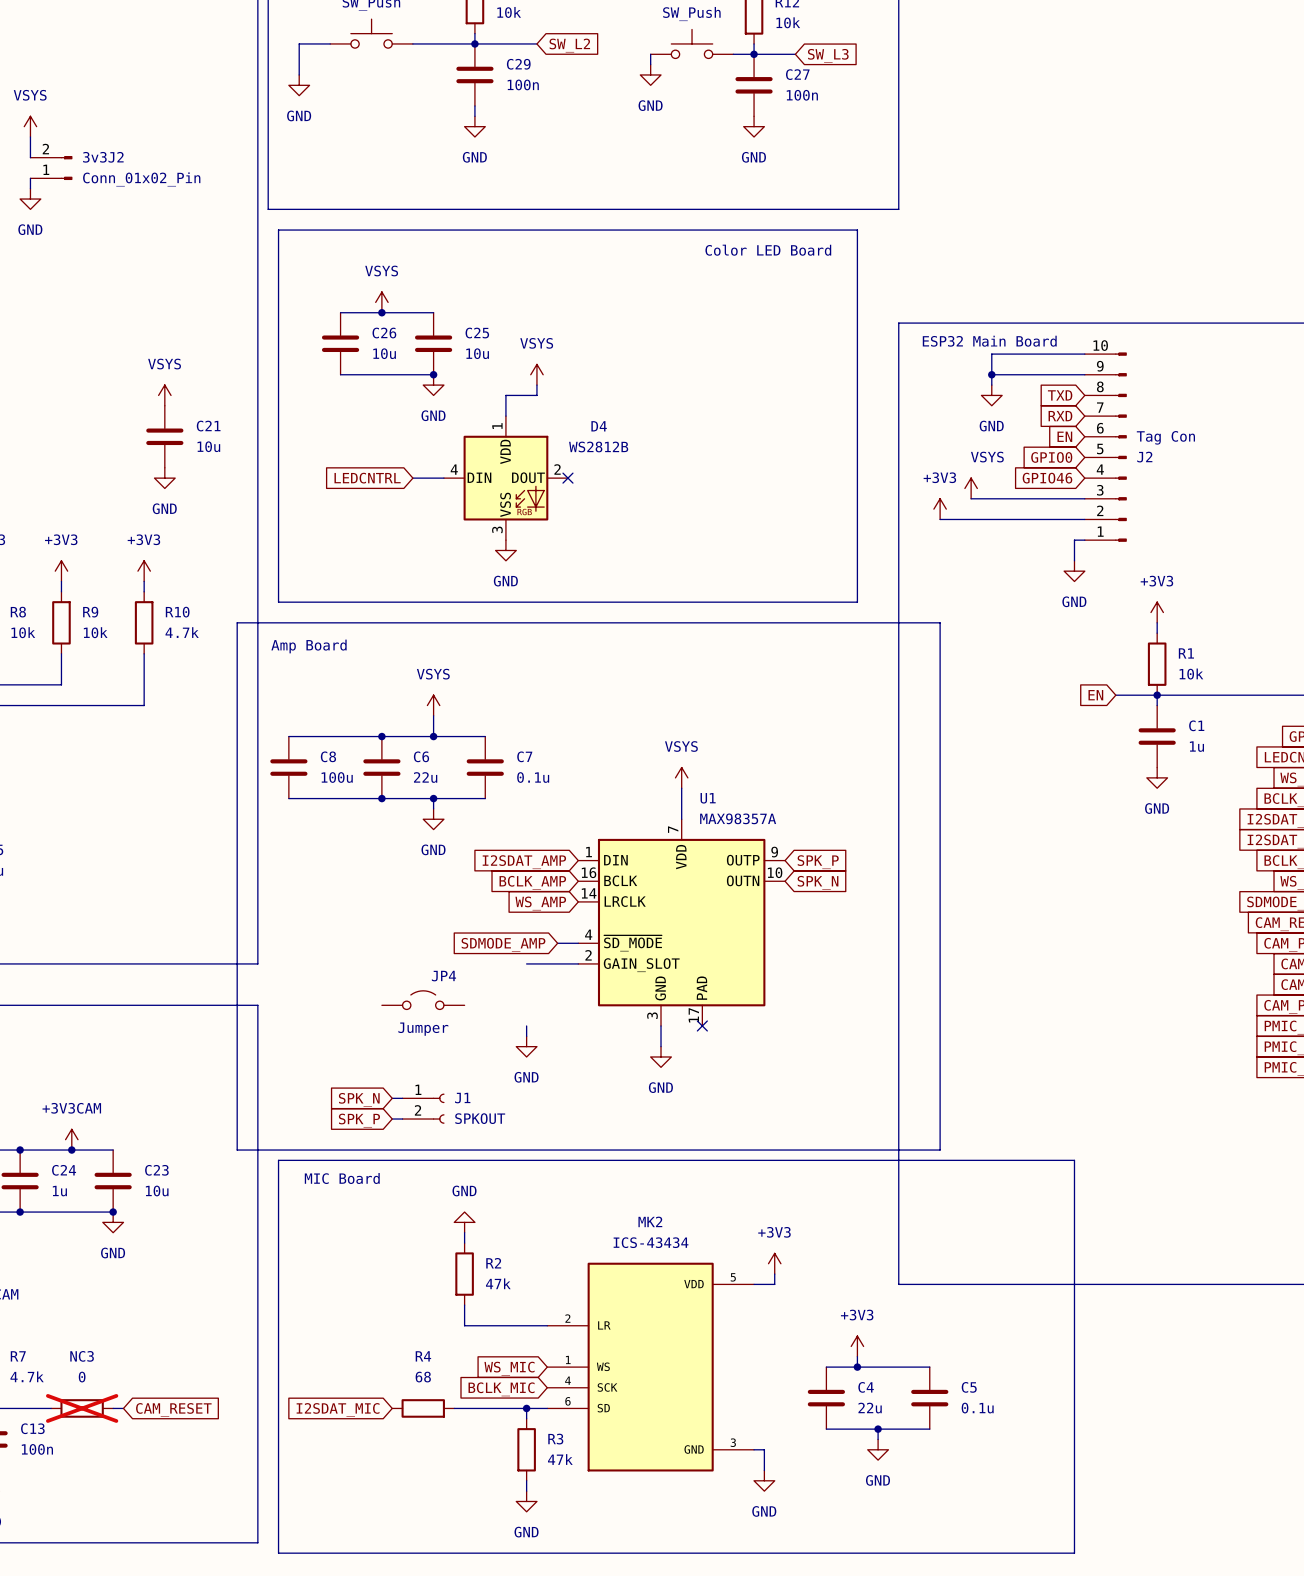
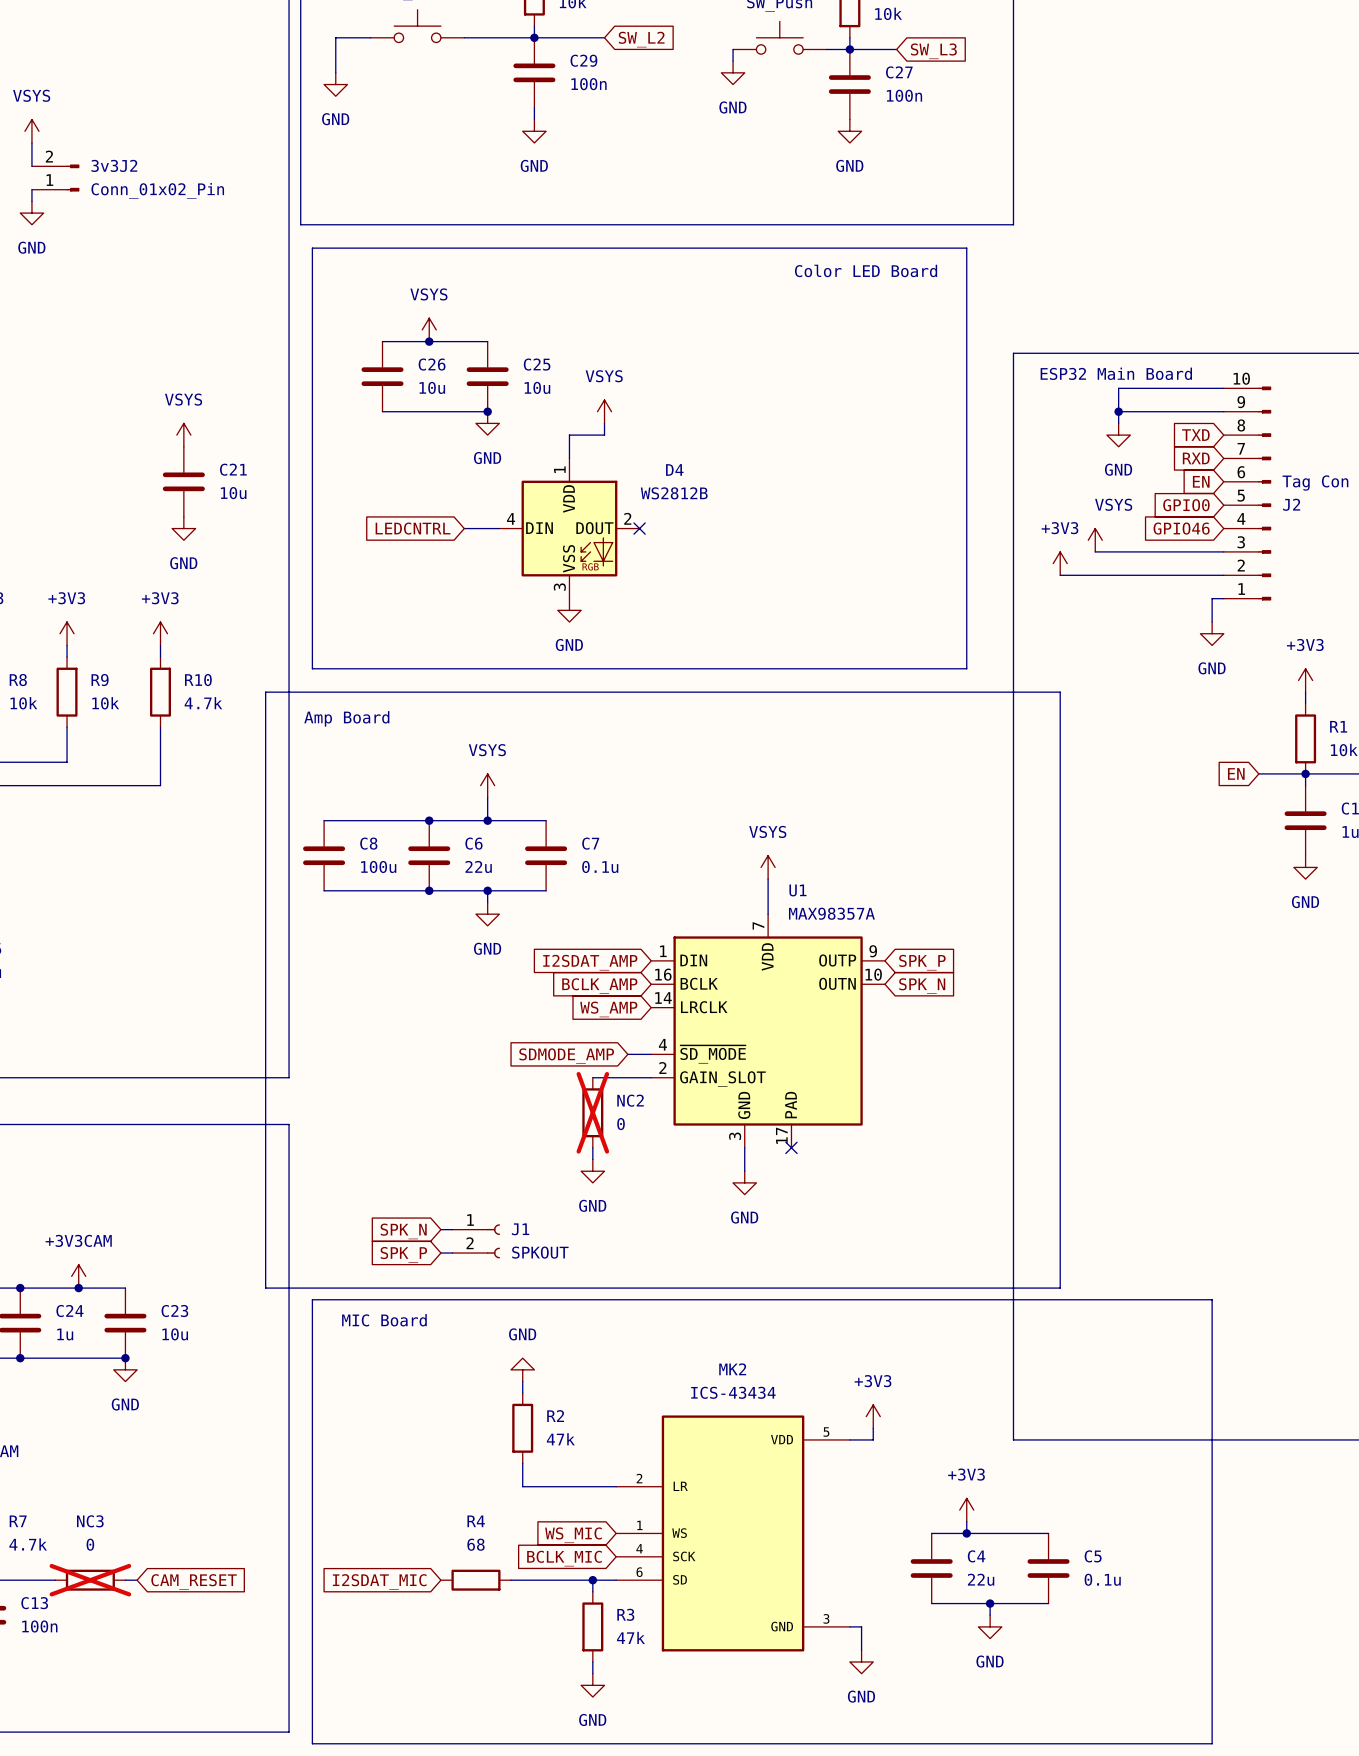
NC2: none -> 0 (592, 1112)
JP4: Jumper (423, 1000) -> none

